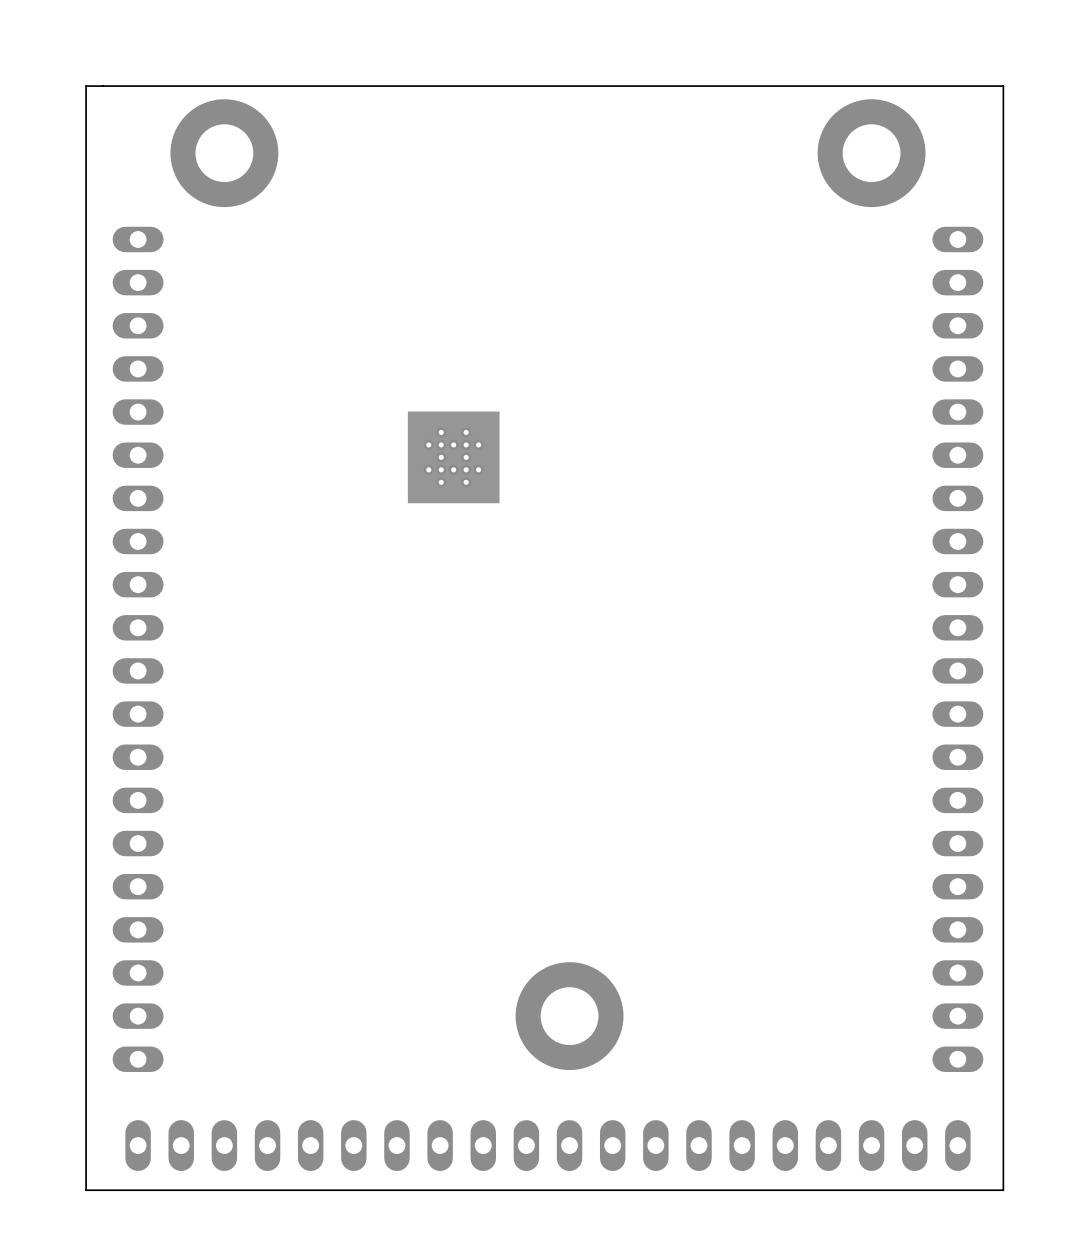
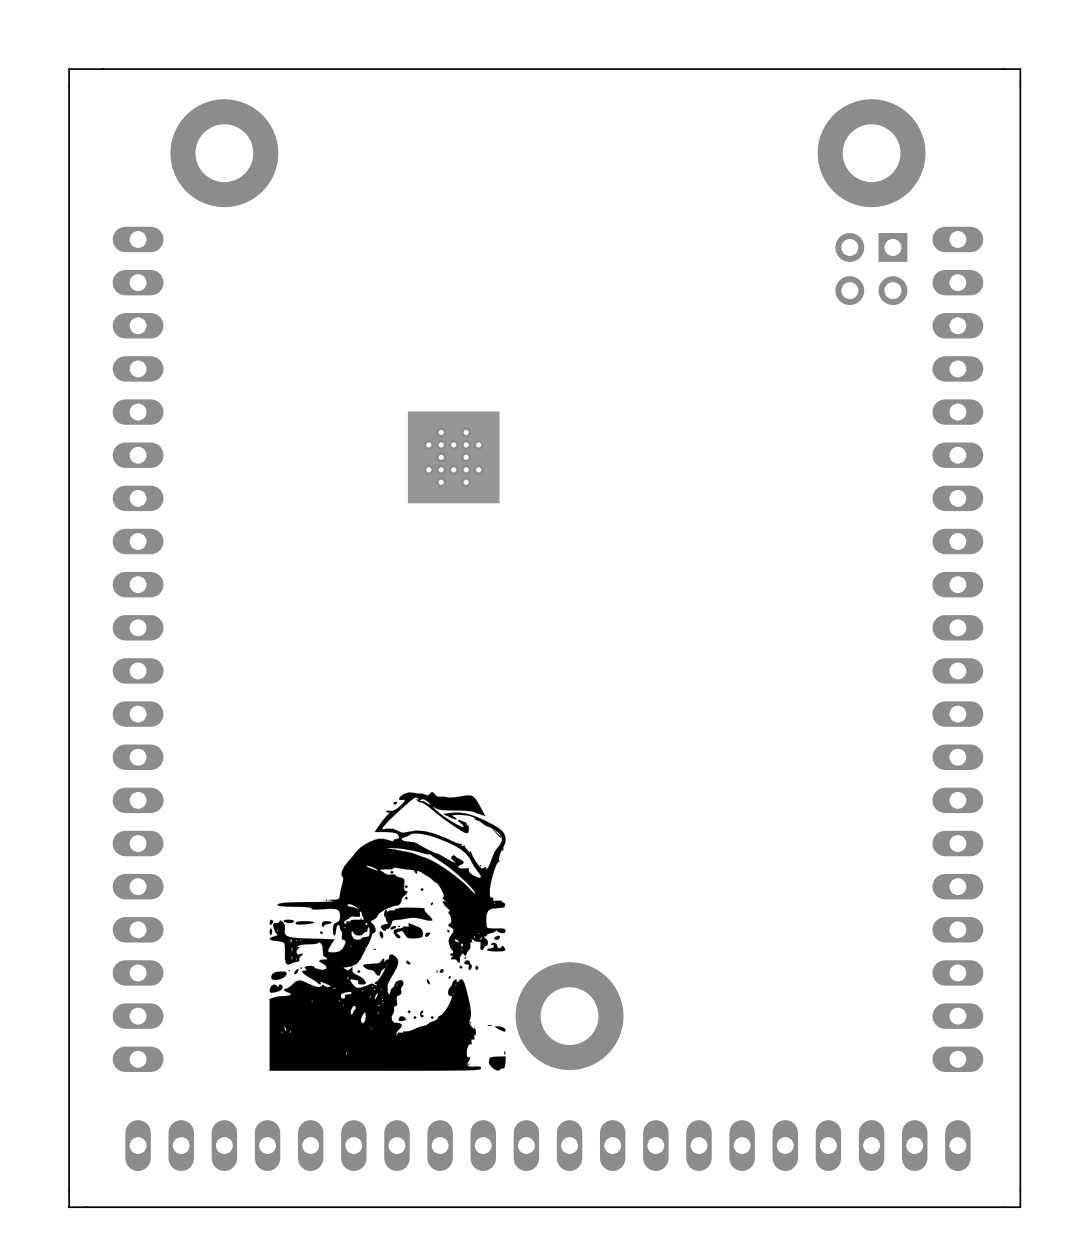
board edge: (1003, 86) (1003, 1190) (86, 1190) (86, 86) (1003, 86) -> (1020, 69) (1020, 1207) (69, 1207) (69, 69) (1020, 69)
part: none -> (871, 269)
drawing: none -> [269, 791, 506, 1071]

